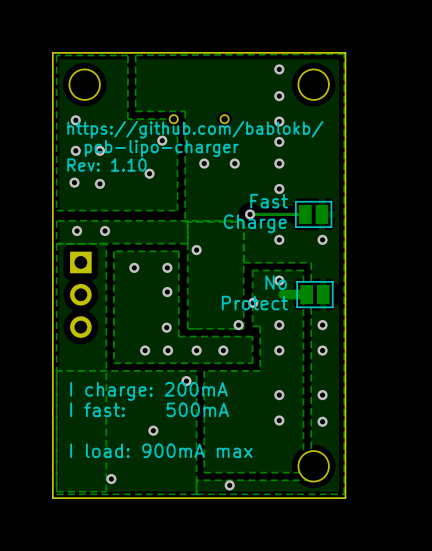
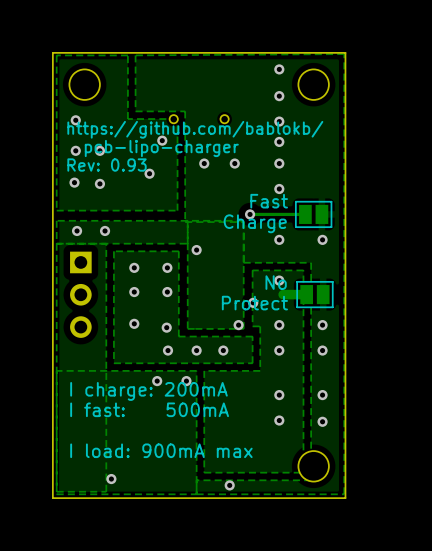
text: Rev: 1.10 (107, 165) -> Rev: 0.93 (107, 165)
via: none -> (134, 292)
via: none -> (134, 323)
via: (145, 350) -> none
via: none -> (157, 381)
via: (153, 430) -> none

